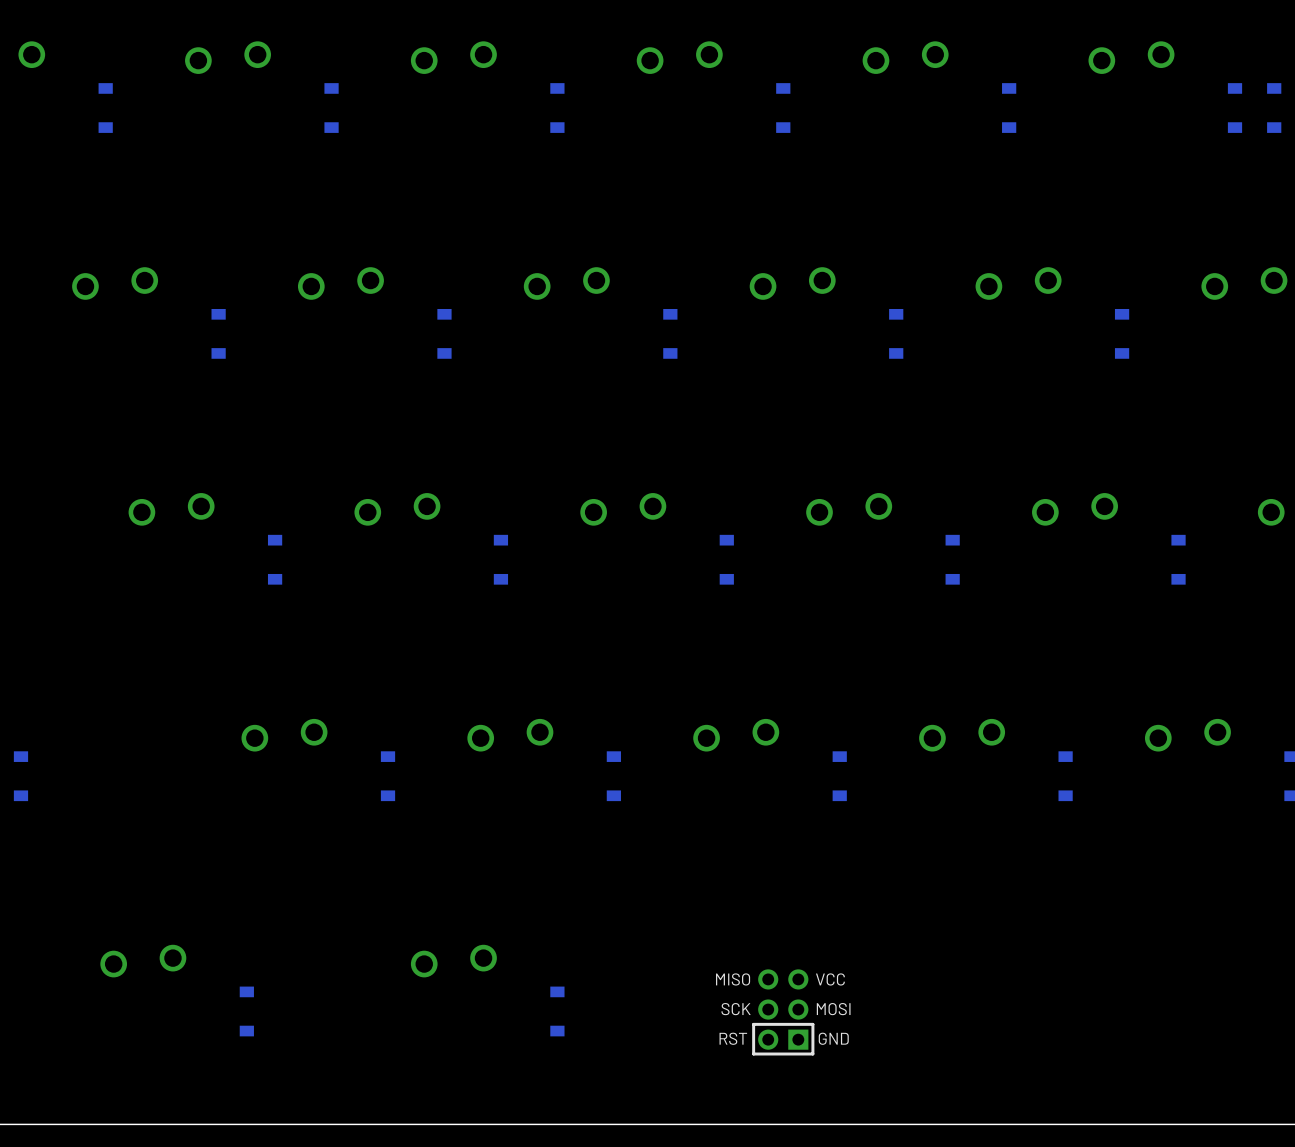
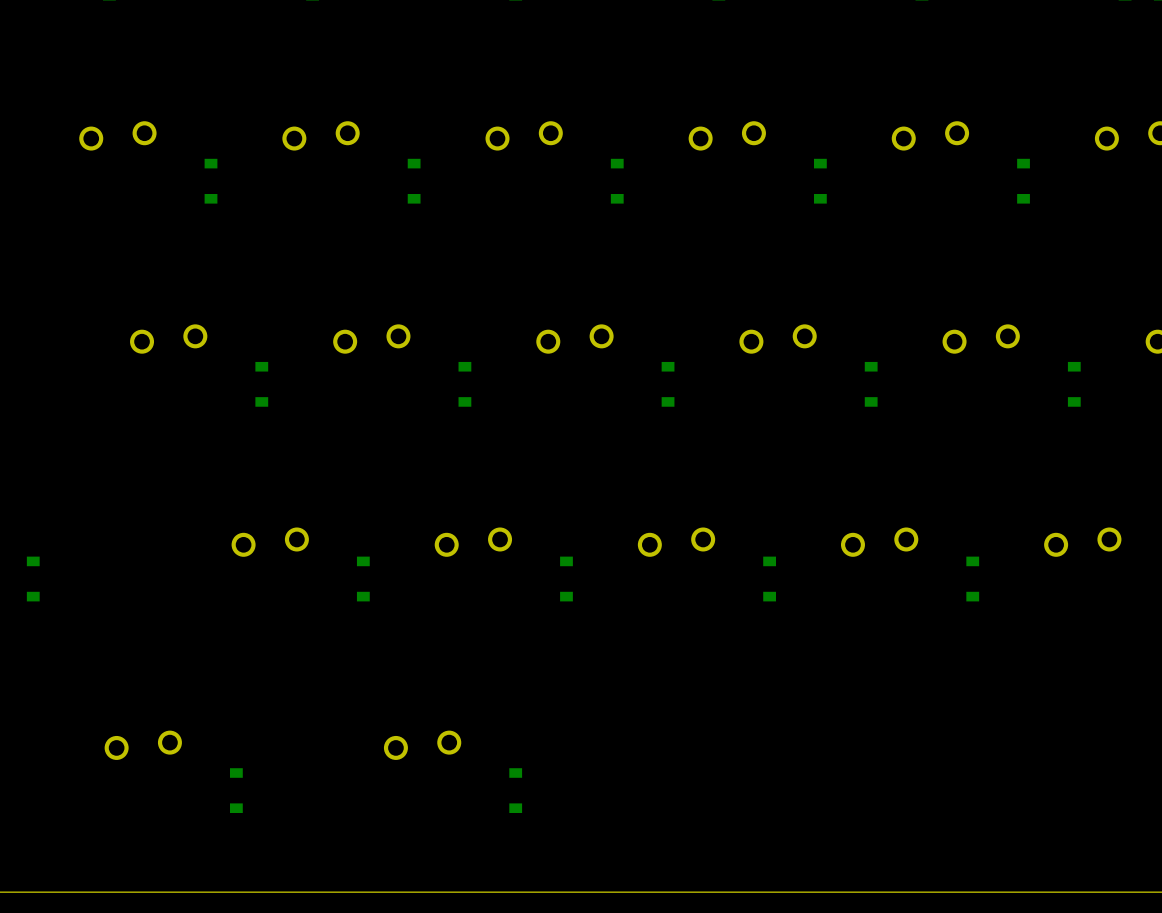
part: (783, 1012) -> none

